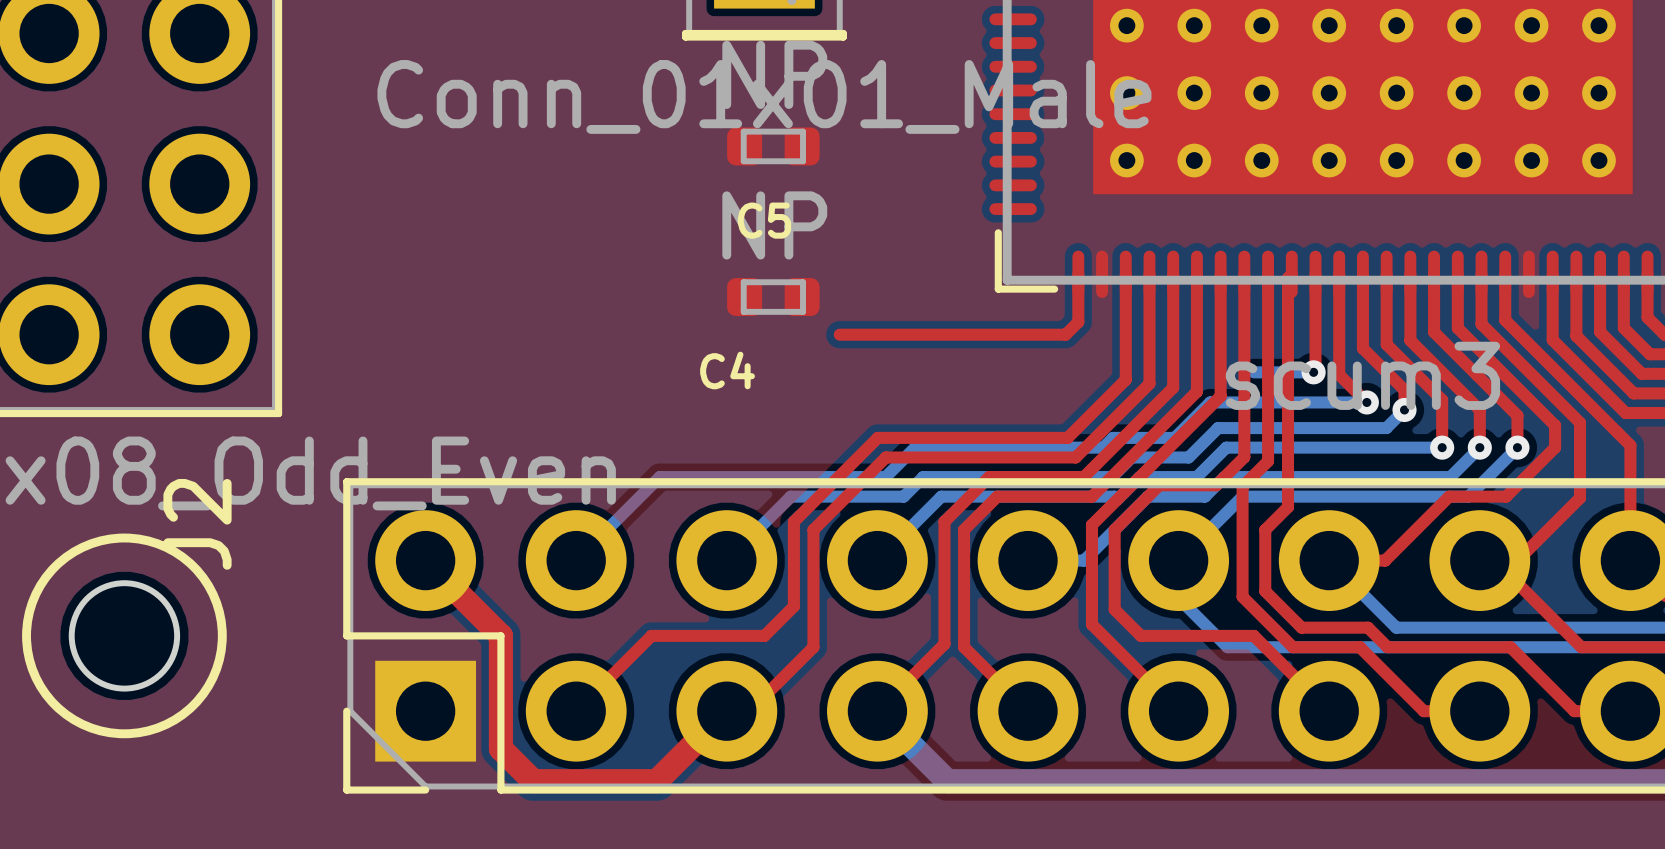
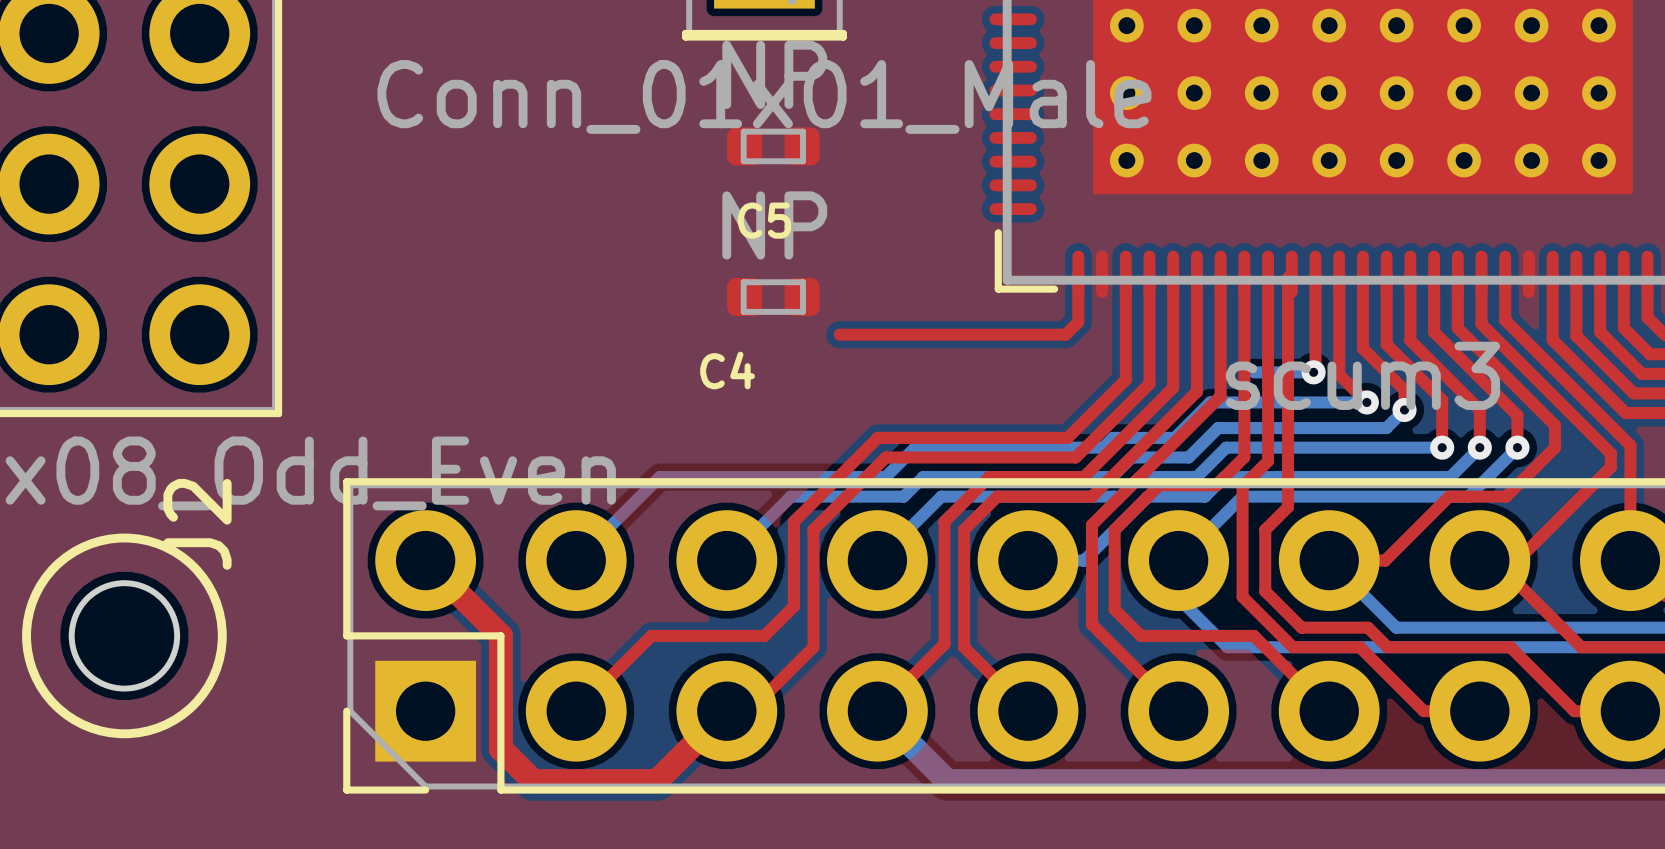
top track: (1580, 422) (1580, 498) -> (1580, 422) (1610, 453) (1610, 467) (1580, 498)

